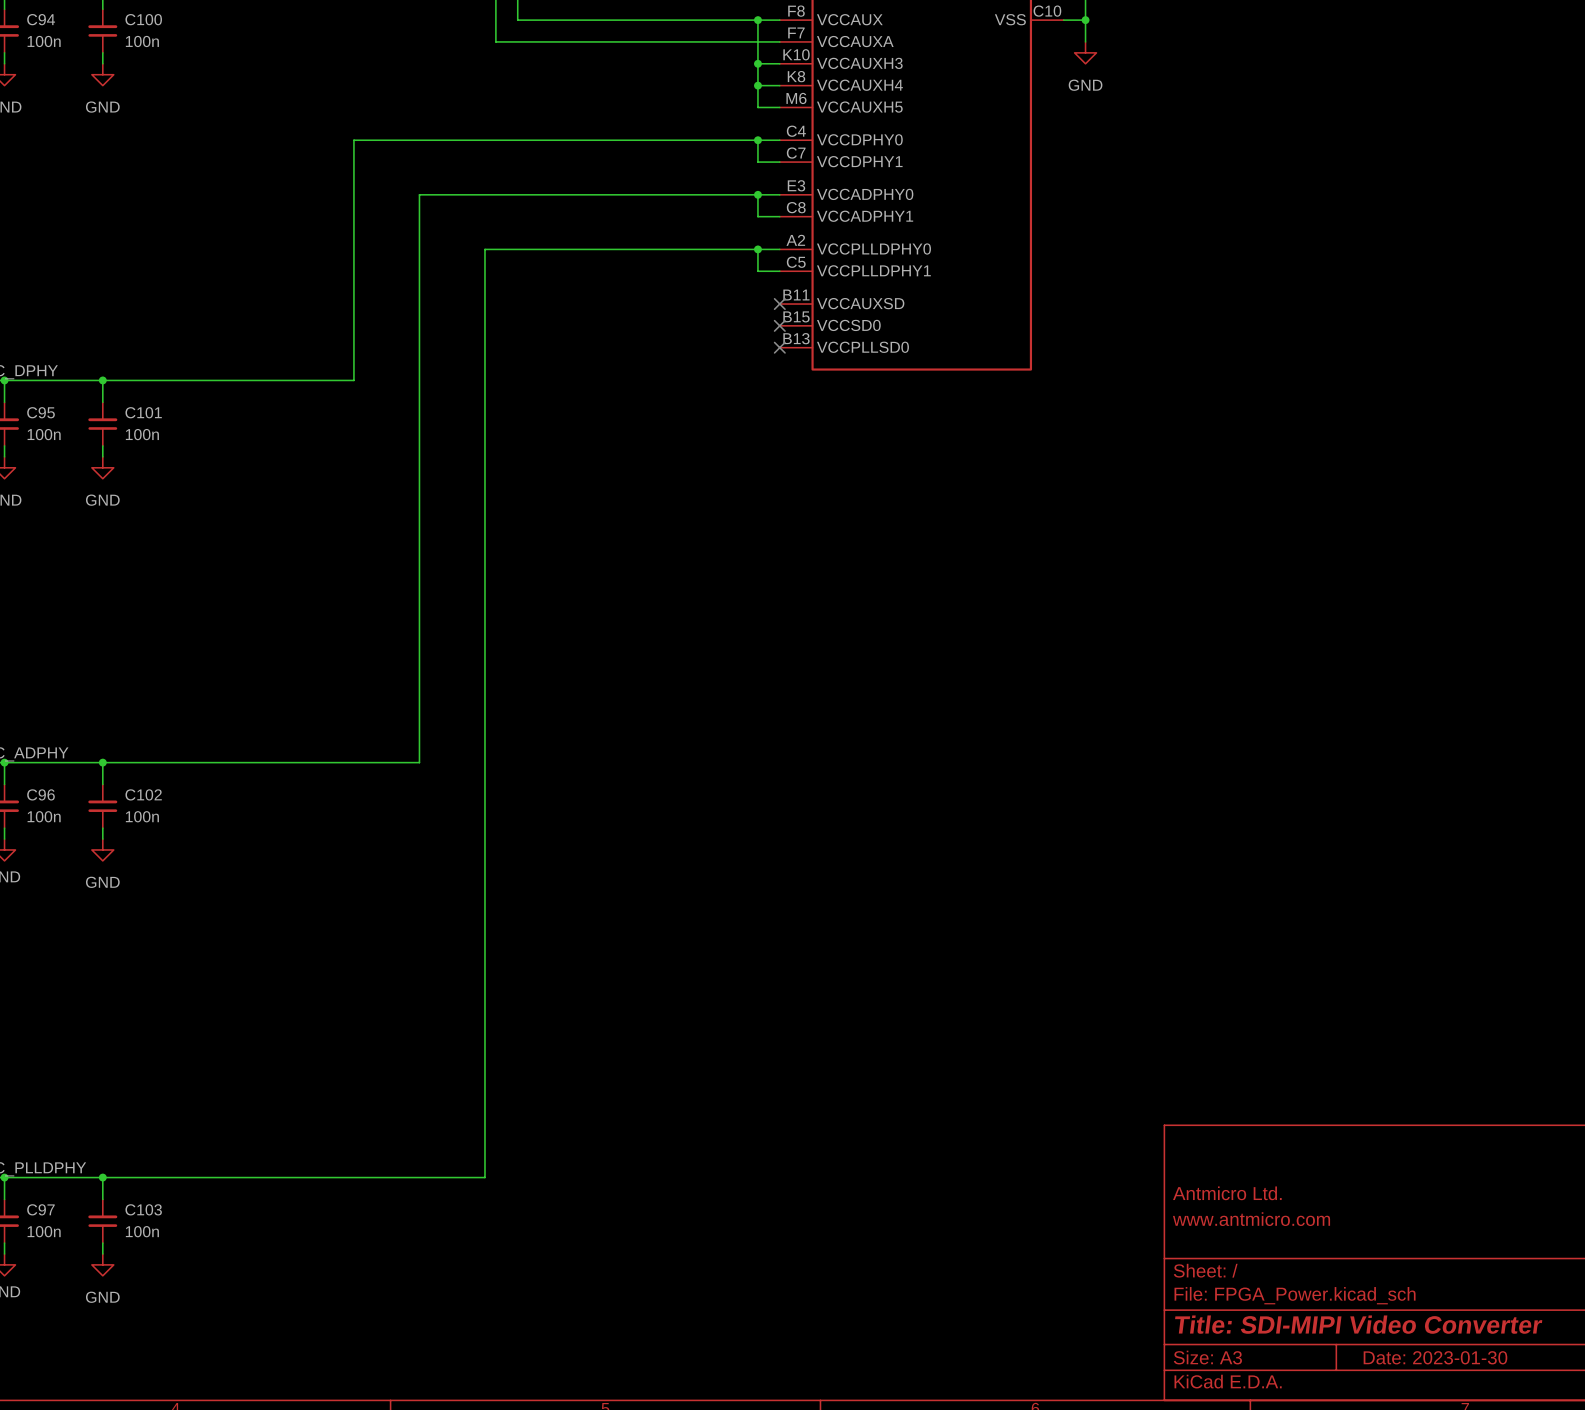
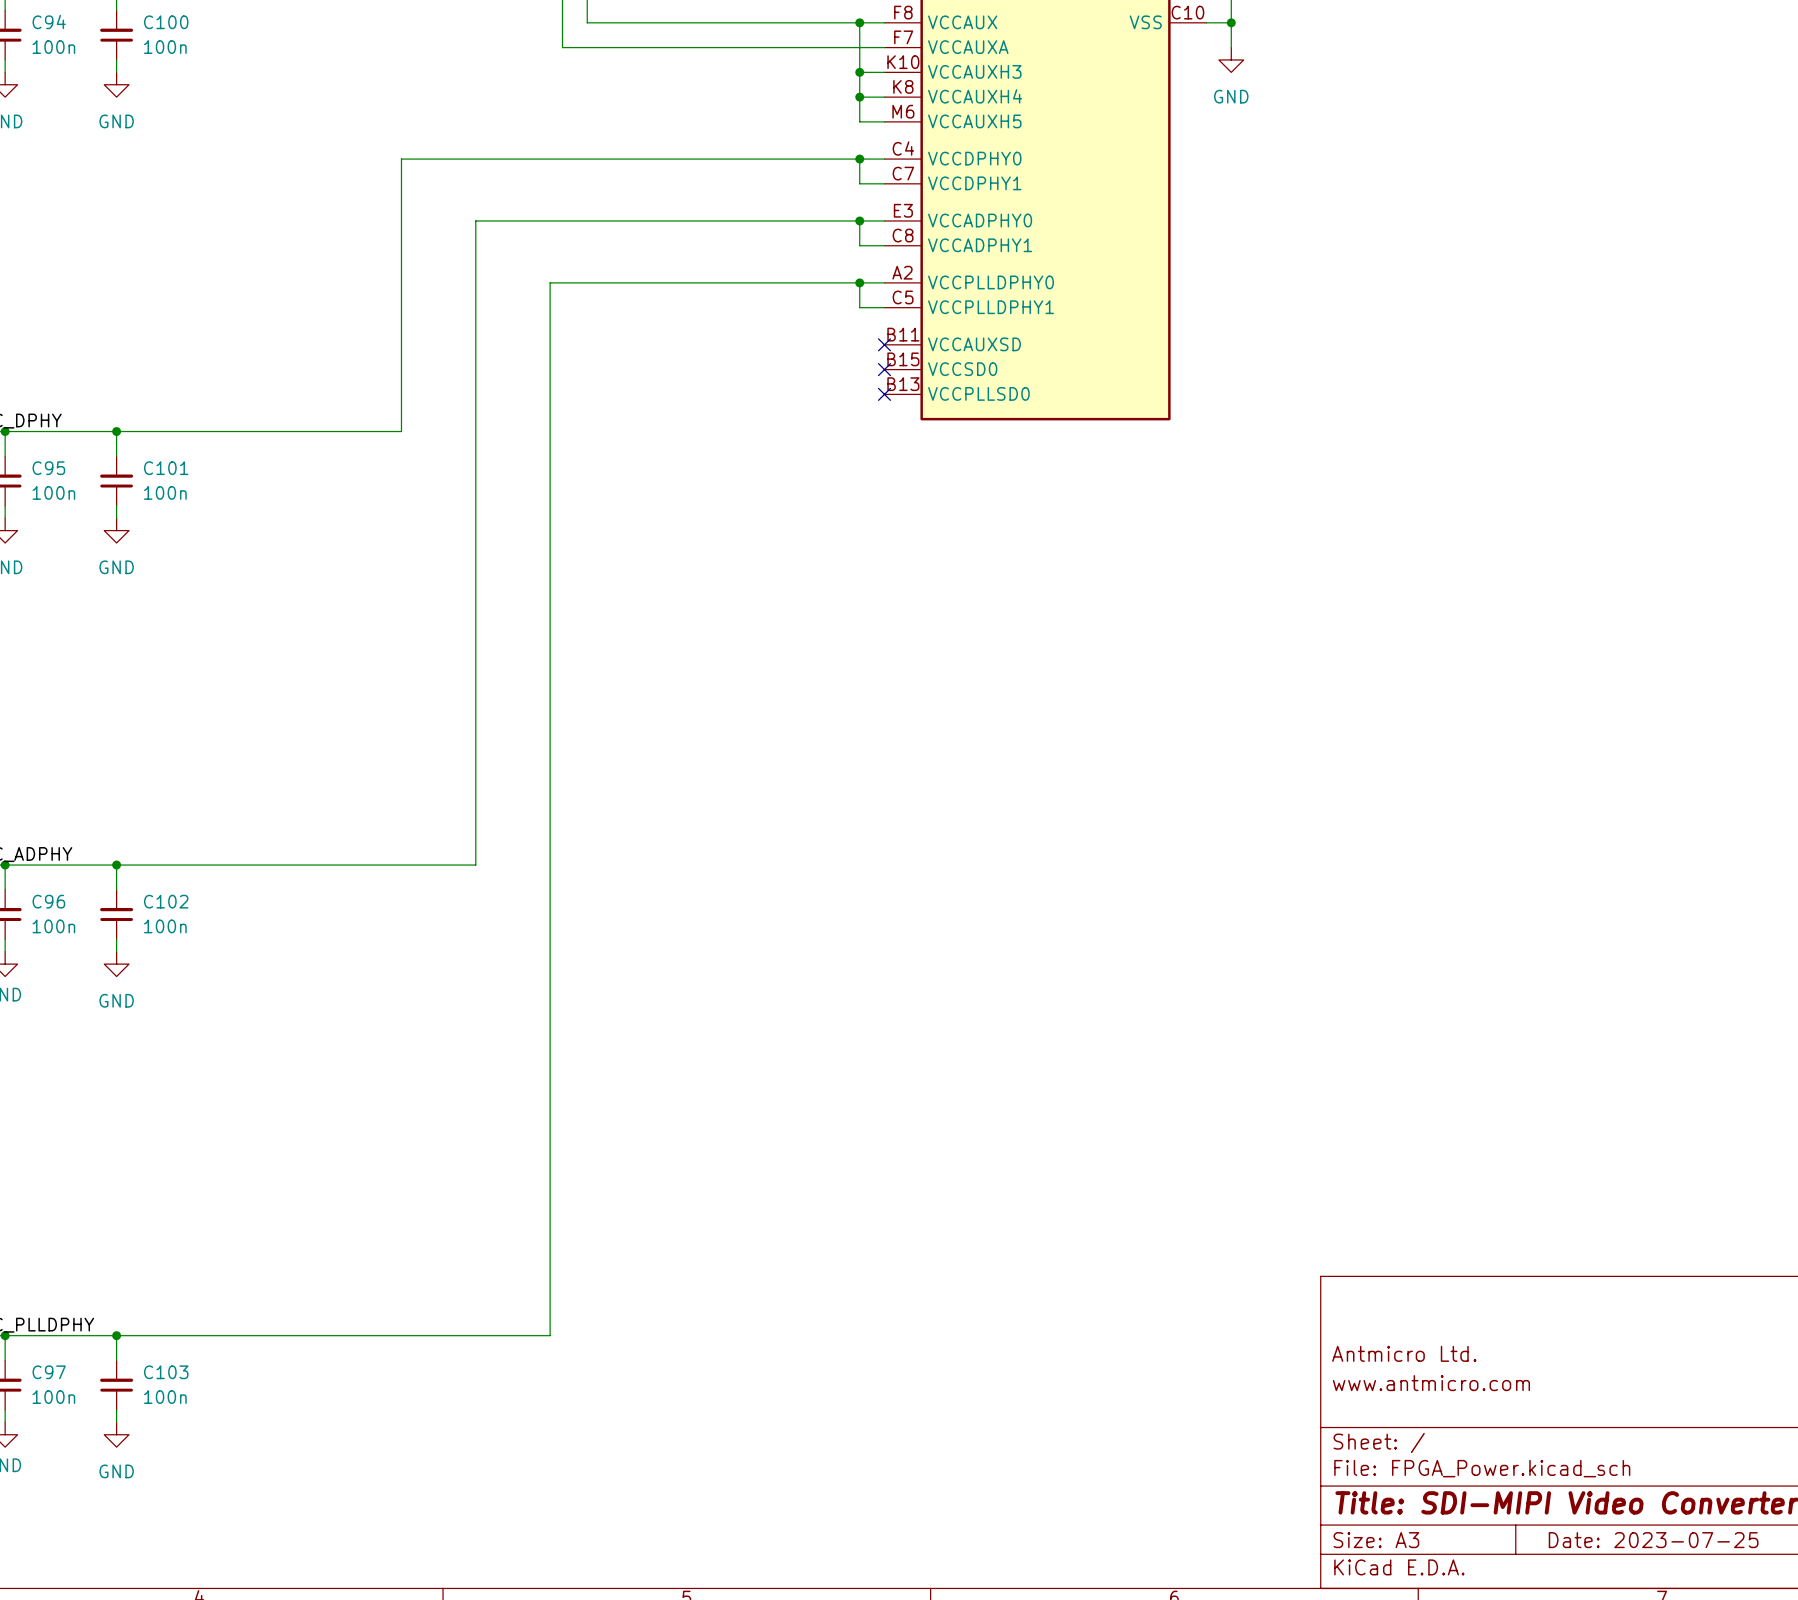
title block: Date: 2023-01-30 (1435, 1357) -> Date: 2023-07-25 (1653, 1540)

